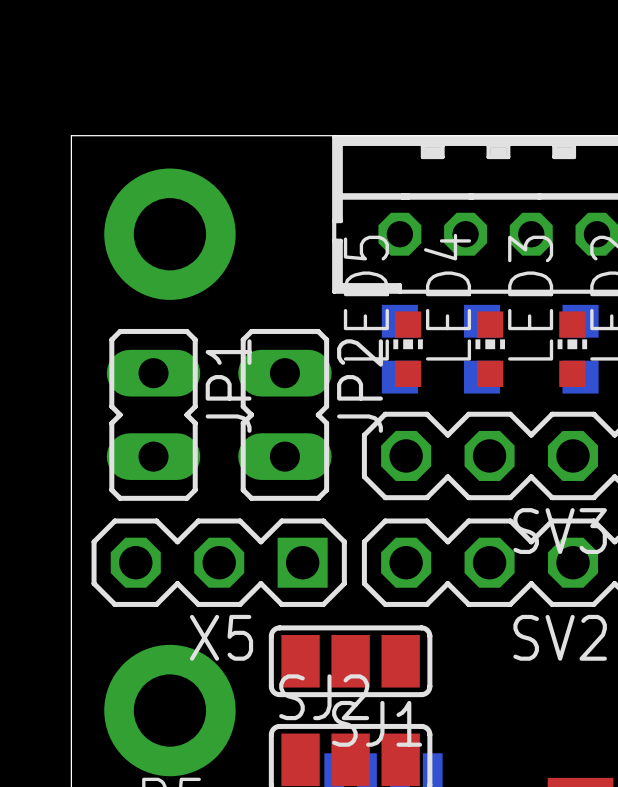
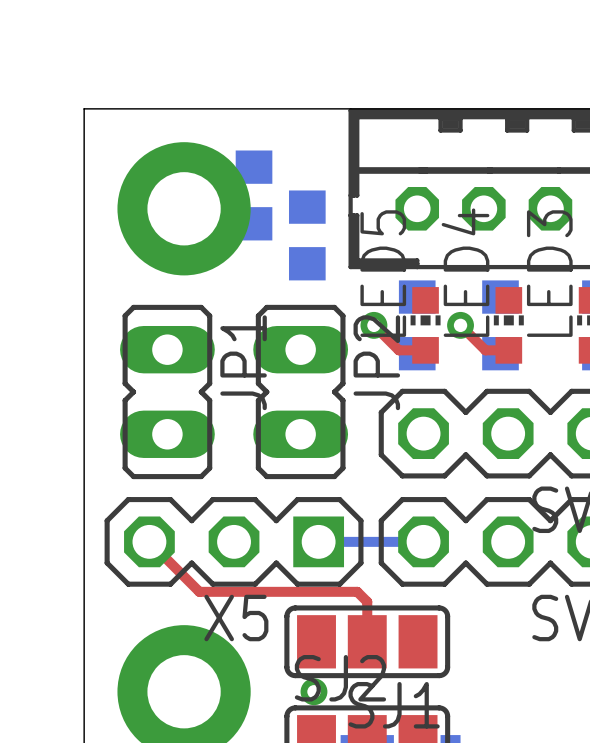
part: none -> (254, 195)
part: none -> (307, 235)
top track: none -> (373, 325) (398, 350) (425, 350)
via: none -> (373, 325)
top track: none -> (460, 325) (485, 350) (508, 350)
via: none -> (460, 325)
top track: none -> (149, 541) (199, 591) (357, 591) (367, 601) (367, 641)
bottom track: none -> (318, 541) (423, 541)
via: none -> (313, 691)

